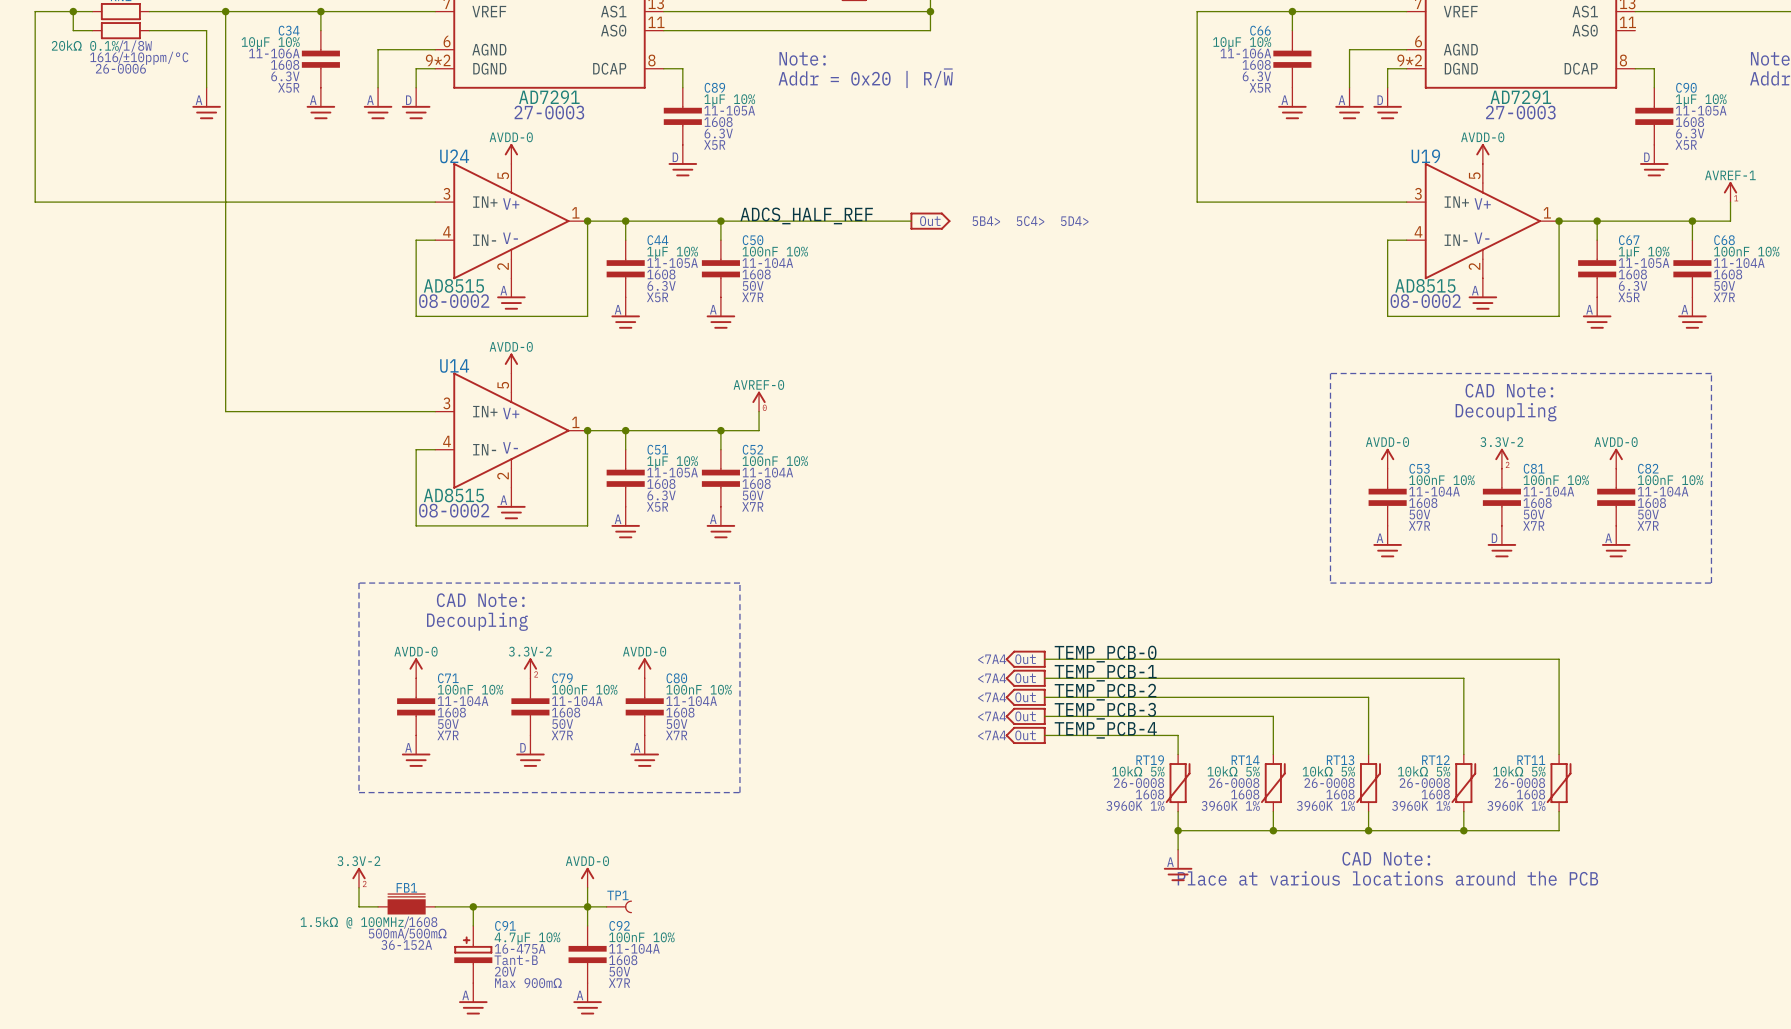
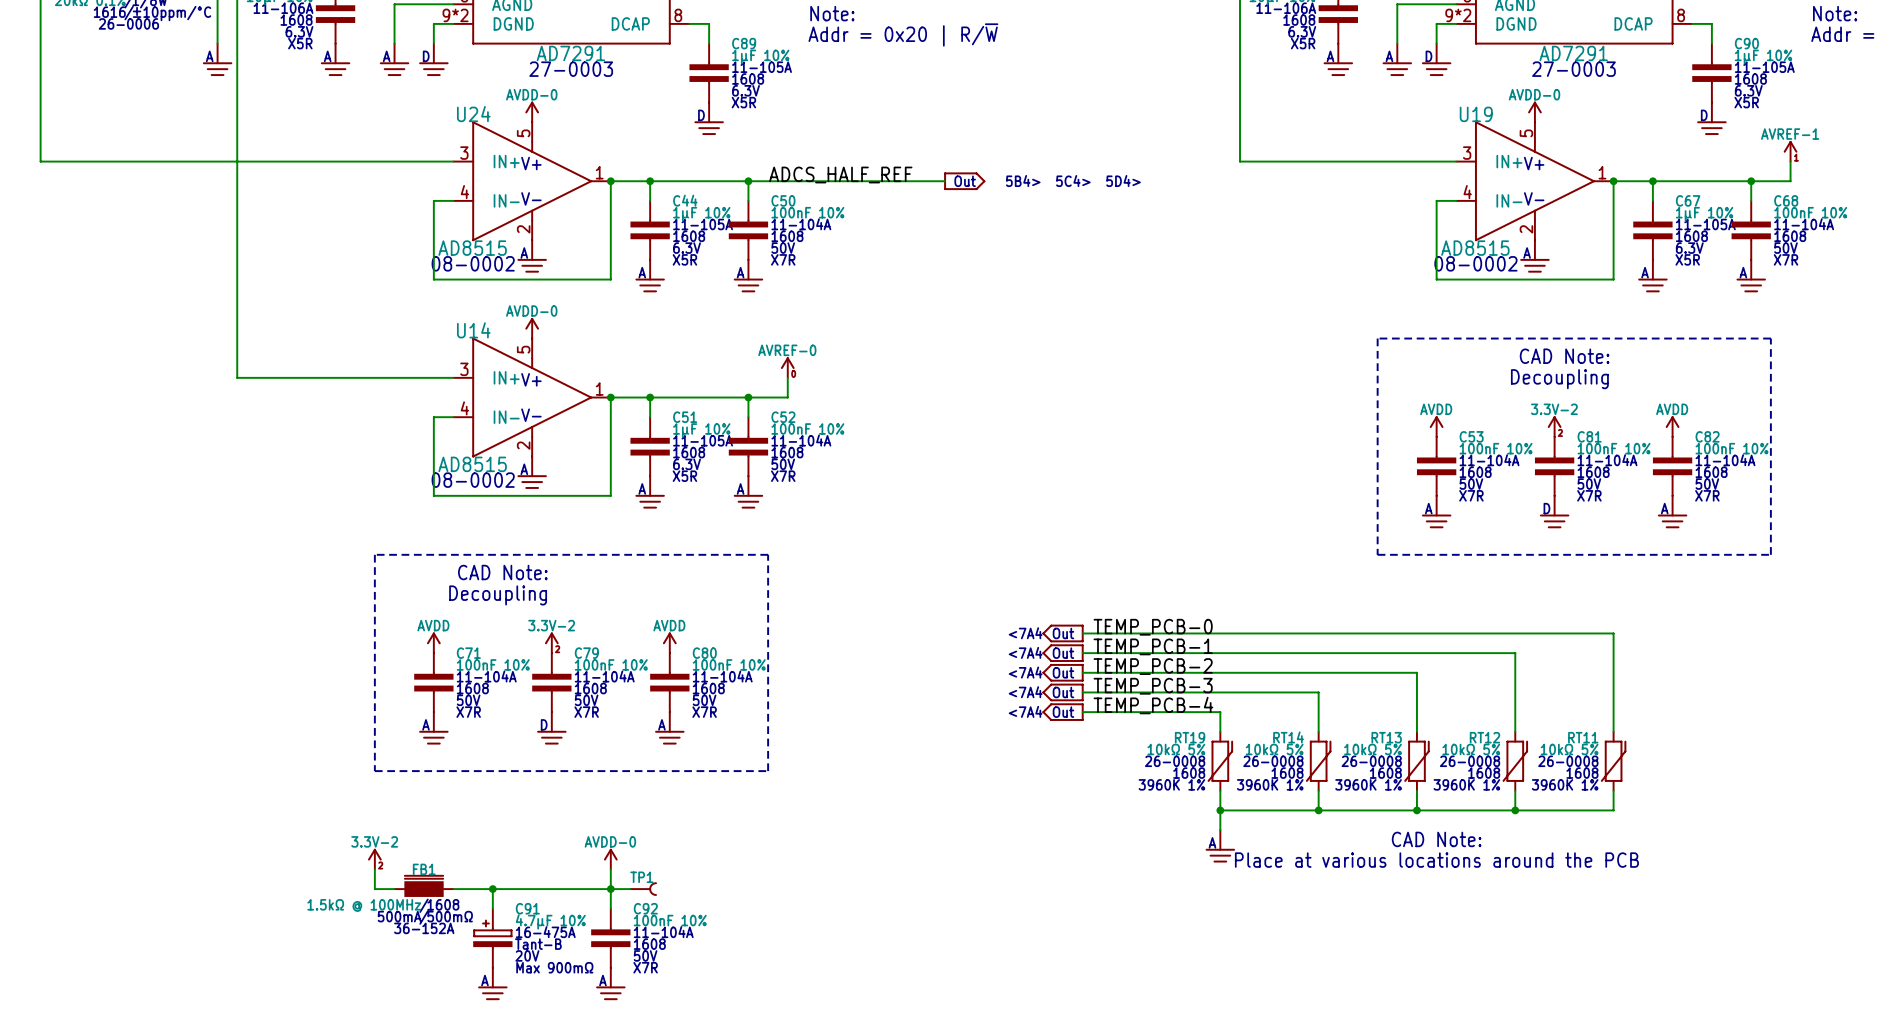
power symbol: AVDD-0 (1387, 458) -> AVDD (1436, 426)
power symbol: AVDD-0 (1616, 458) -> AVDD (1672, 426)
power symbol: AVDD-0 (416, 668) -> AVDD (433, 642)
power symbol: AVDD-0 (644, 668) -> AVDD (669, 642)

